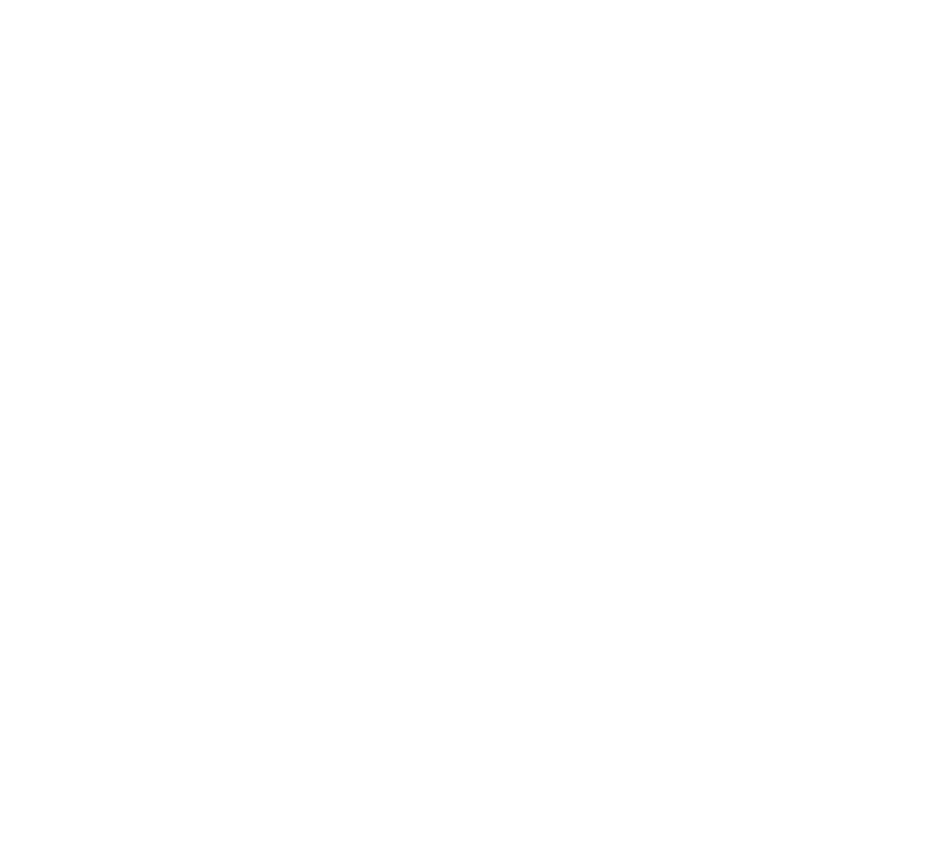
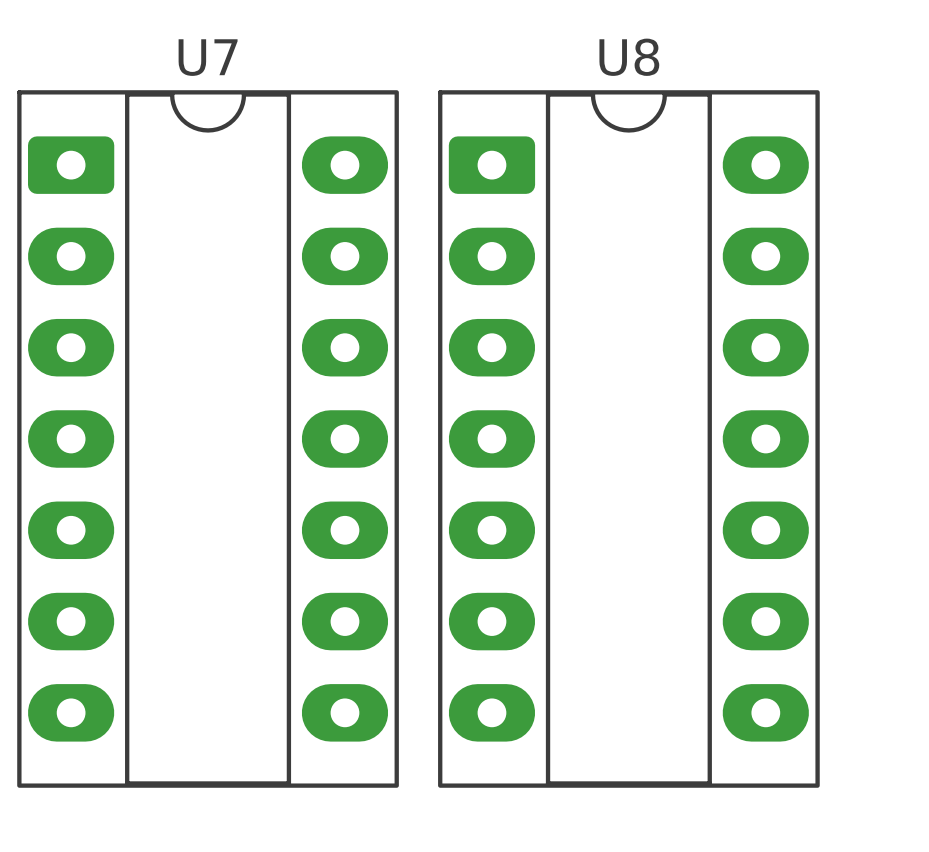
U7: none -> (208, 438)
U8: none -> (628, 438)

